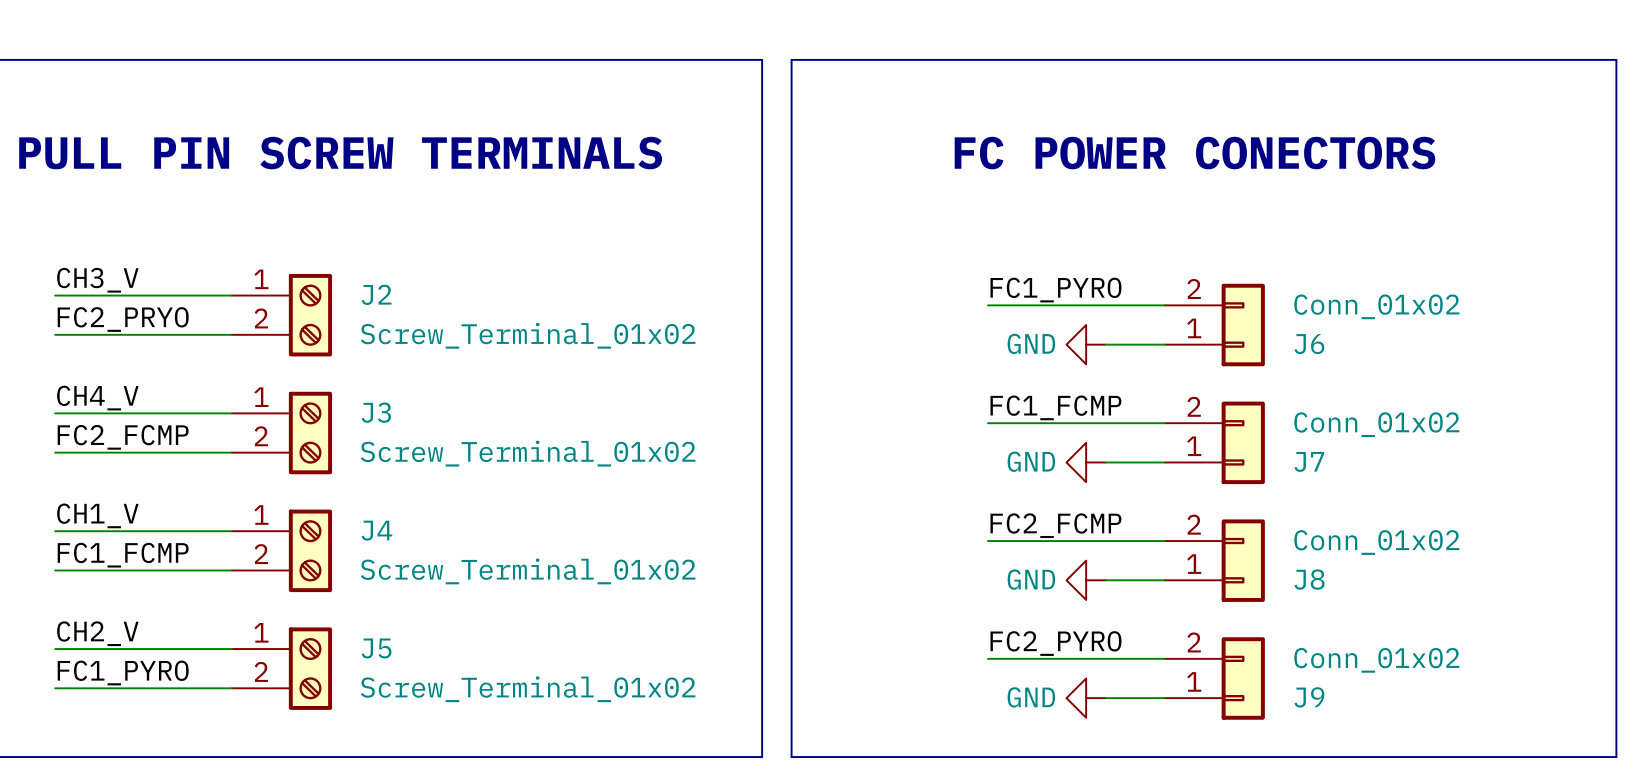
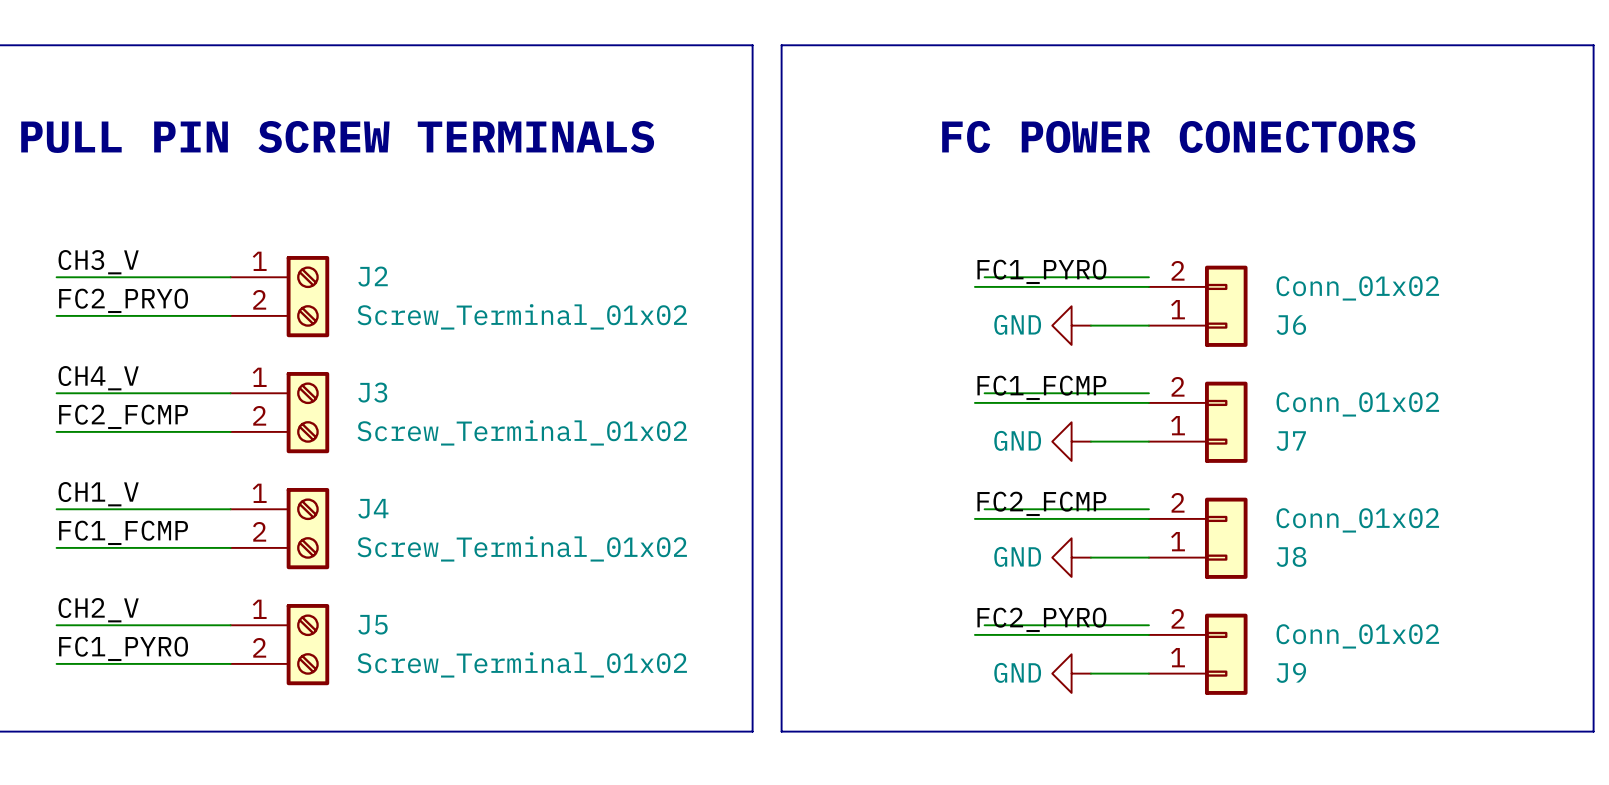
wire: none -> (984, 277) (1148, 277)
wire: none -> (984, 393) (1148, 393)
wire: none -> (984, 509) (1148, 509)
wire: none -> (984, 625) (1148, 625)

